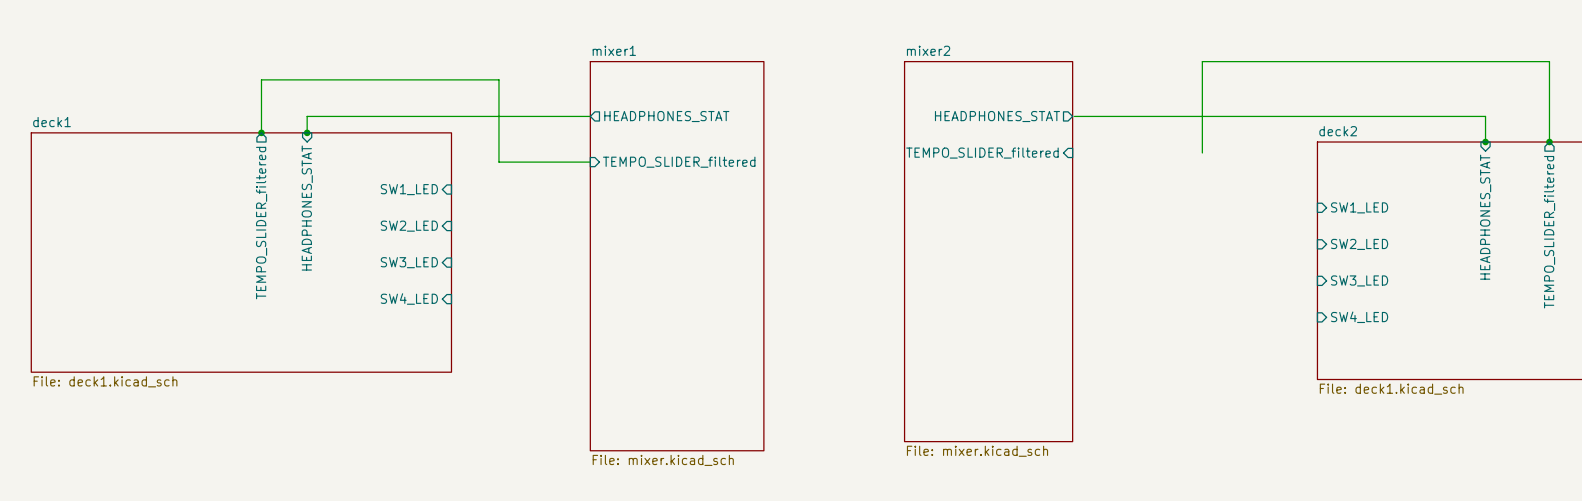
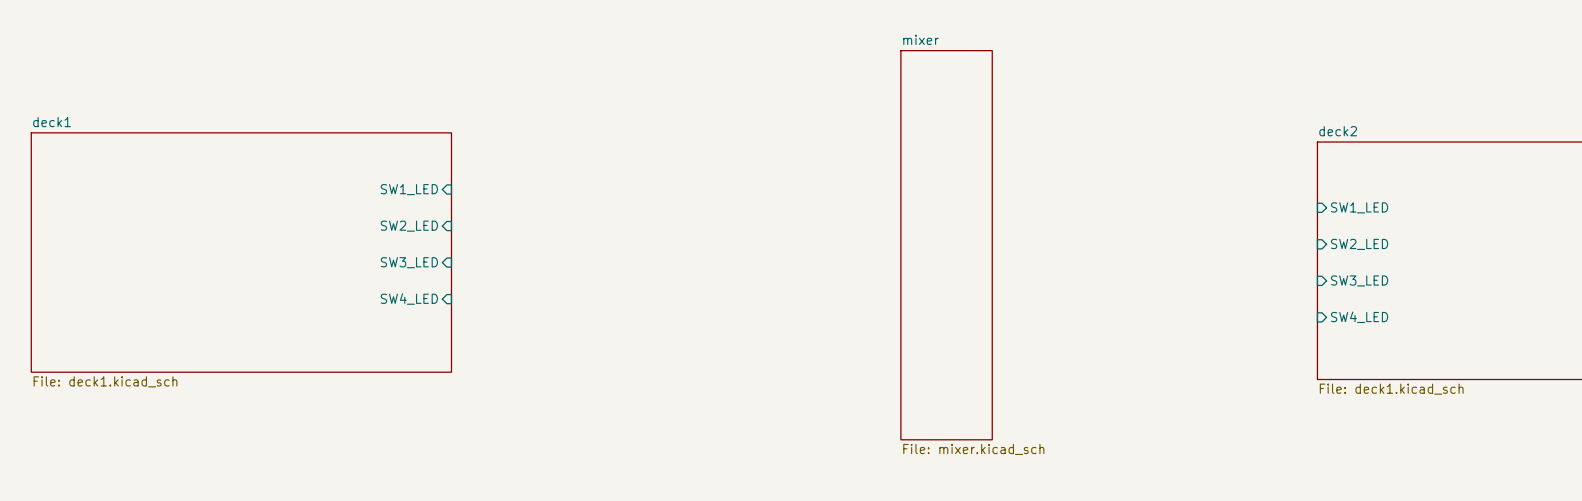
wire: (590, 116) (307, 116) (307, 134) -> none
sheet pin: HEADPHONES_STAT (666, 116) -> none
sheet pin: HEADPHONES_STAT (997, 116) -> none
wire: (1074, 116) (1485, 116) (1485, 143) -> none
junction: (261, 132) -> none
junction: (307, 132) -> none
wire: (261, 134) (261, 79) (498, 79) (498, 162) (590, 162) -> none
junction: (1485, 142) -> none
junction: (1549, 142) -> none
wire: (1549, 143) (1549, 61) (1202, 61) (1202, 152) -> none
sheet pin: TEMPO_SLIDER_filtered (982, 153) -> none
sheet pin: TEMPO_SLIDER_filtered (679, 162) -> none
sheet pin: HEADPHONES_STAT (307, 208) -> none
sheet pin: HEADPHONES_STAT (1485, 217) -> none
sheet pin: TEMPO_SLIDER_filtered (261, 223) -> none
sheet pin: TEMPO_SLIDER_filtered (1549, 232) -> none
sheet mixer: none -> File: mixer.kicad_sch (946, 245)
sheet mixer2: File: mixer.kicad_sch (988, 251) -> none
sheet mixer1: File: mixer.kicad_sch (677, 256) -> none

